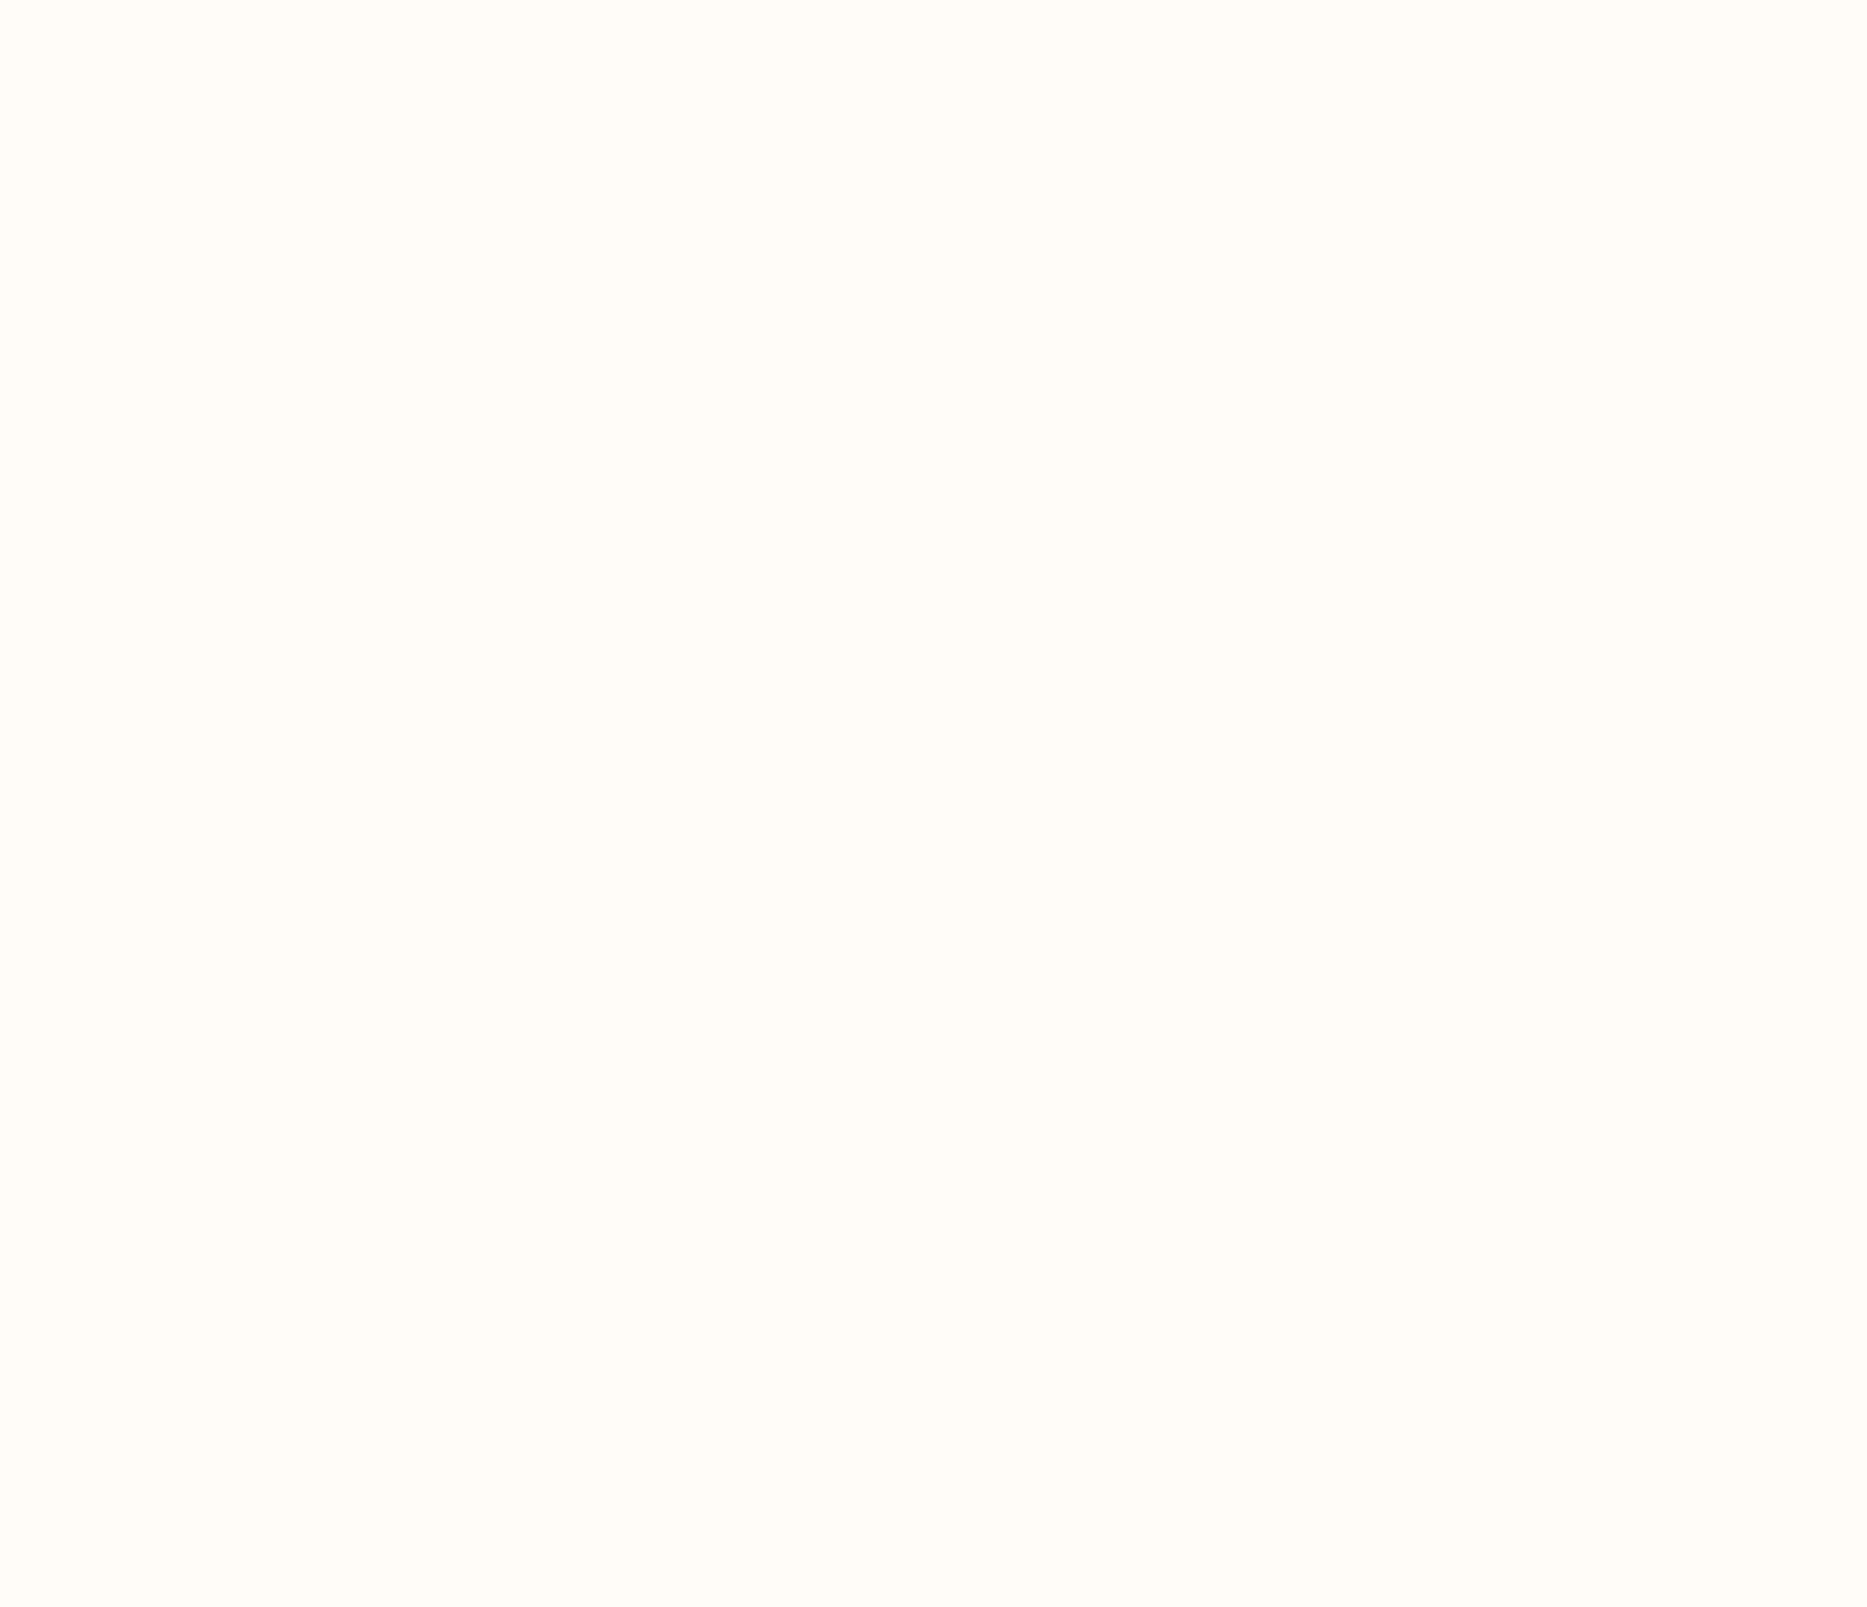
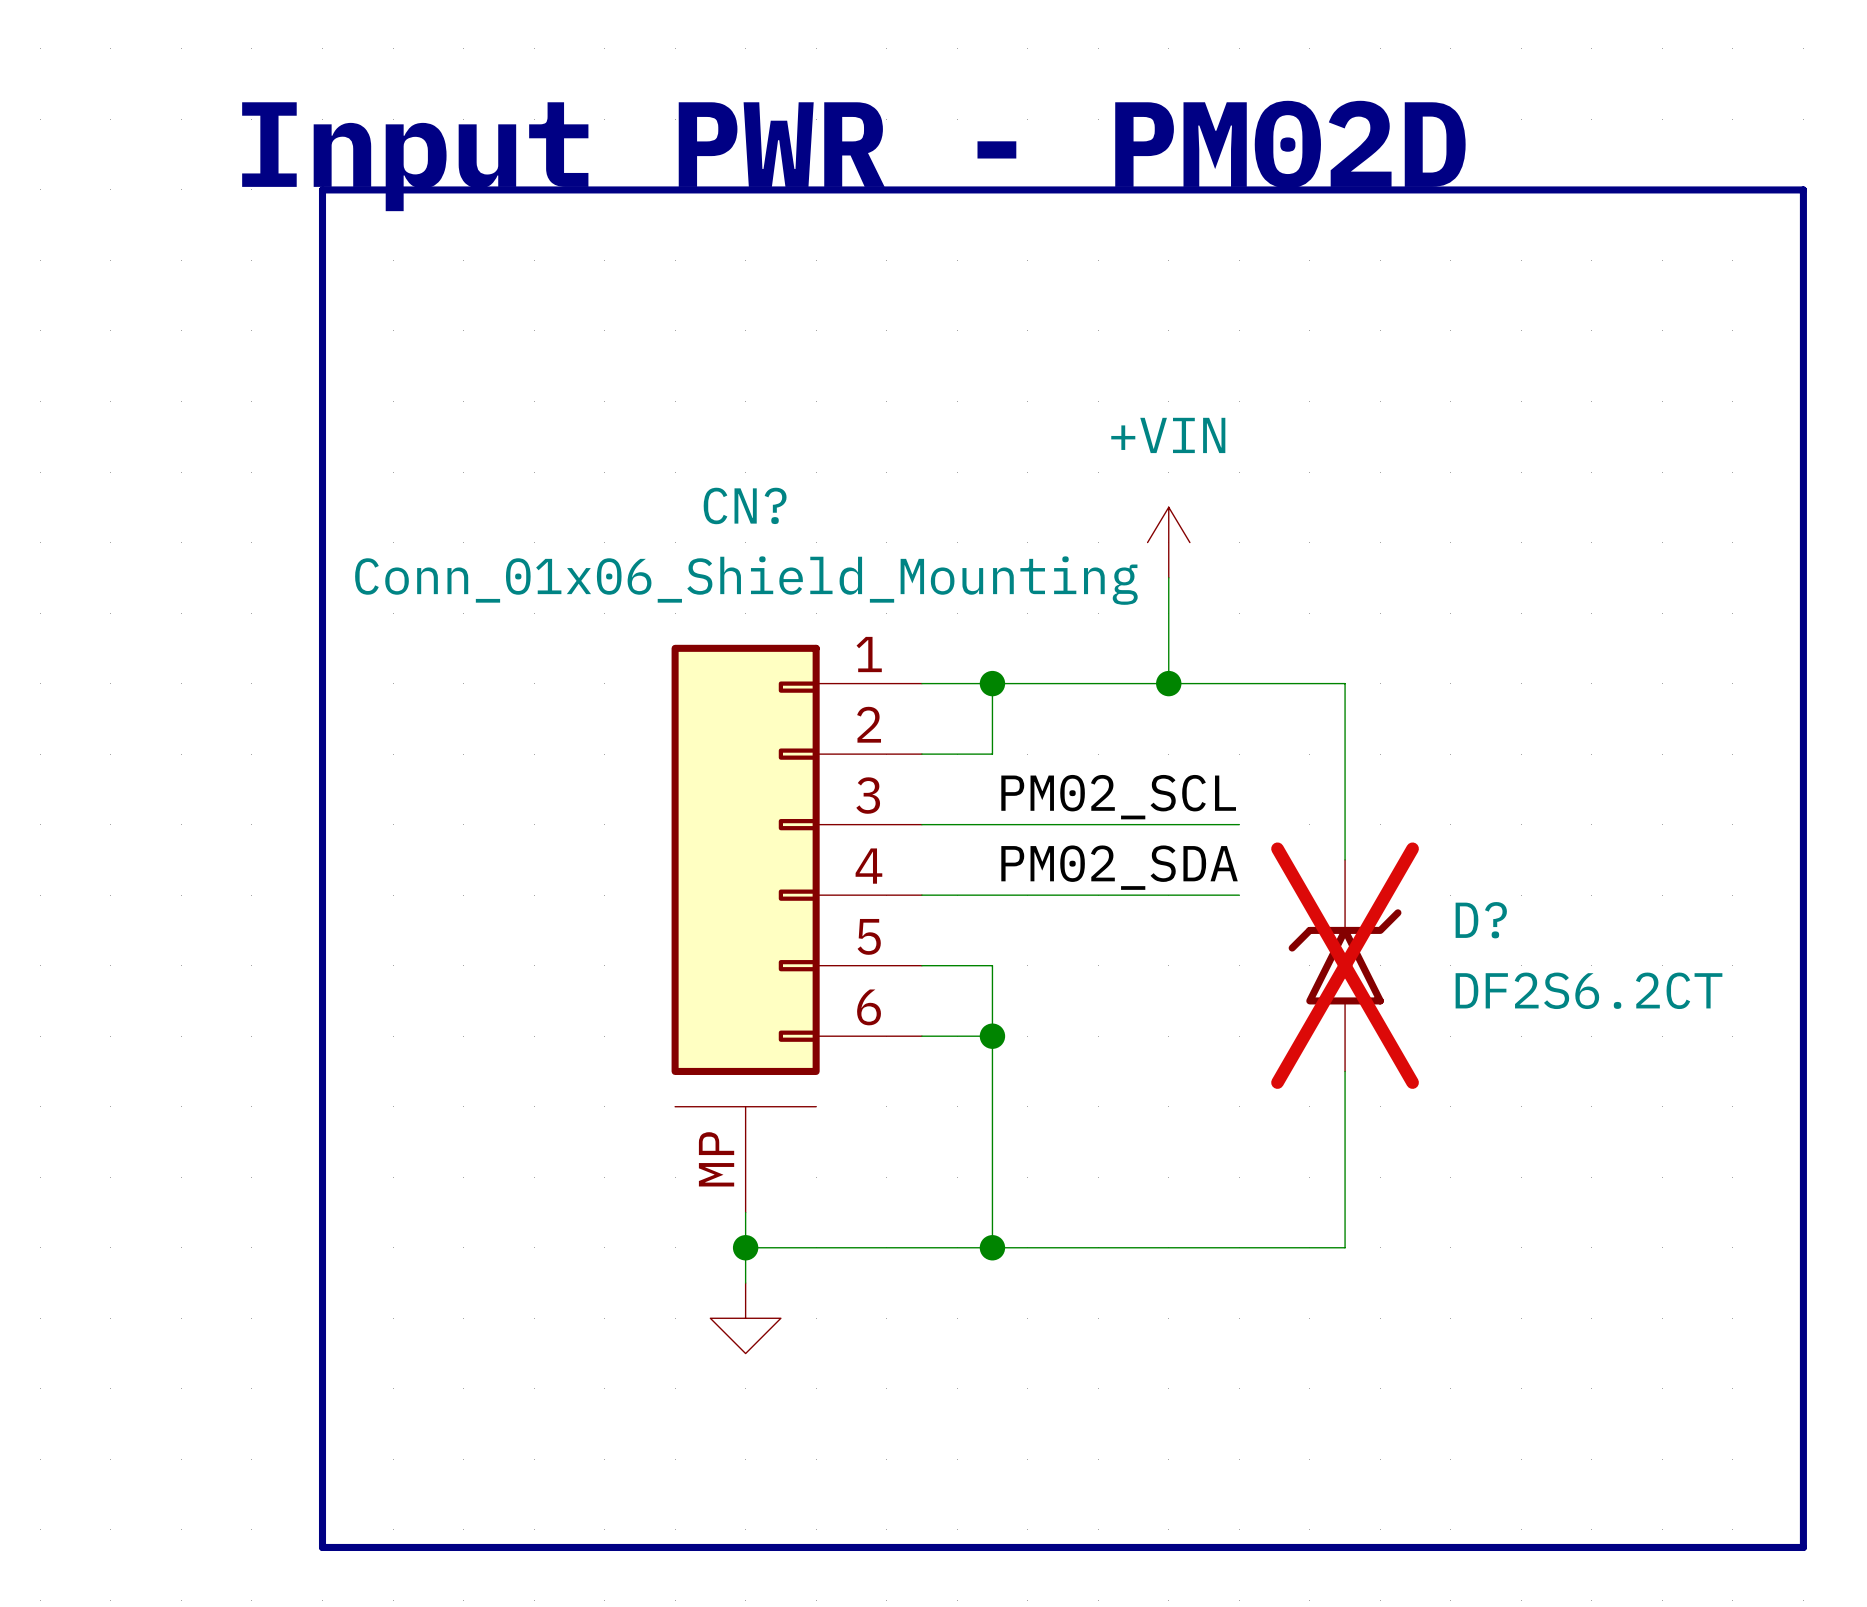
text: none -> Input PWR - PM02D (853, 155)
line: none -> (322, 189) (1803, 189) (1803, 1547) (322, 1547) (322, 189)
power symbol: none -> +VIN (1168, 542)
wire: none -> (1168, 577) (1168, 683)
wire: none -> (921, 683) (1345, 683) (1345, 859)
wire: none -> (992, 683) (992, 754) (921, 754)
junction: none -> (992, 683)
junction: none -> (1168, 683)
label: none -> PM02_SCL (1118, 797)
wire: none -> (921, 824) (1239, 824)
label: none -> PM02_SDA (1119, 867)
wire: none -> (921, 895) (1239, 895)
CN?: none -> Conn_01x06_Shield_Mounting (796, 928)
wire: none -> (921, 965) (992, 965) (992, 1247)
D?: none -> DF2S6.2CT (1345, 965)
wire: none -> (921, 1036) (992, 1036)
junction: none -> (992, 1036)
wire: none -> (1345, 1071) (1345, 1247) (745, 1247)
wire: none -> (745, 1212) (745, 1283)
junction: none -> (745, 1247)
junction: none -> (992, 1247)
power symbol: none -> (745, 1318)

